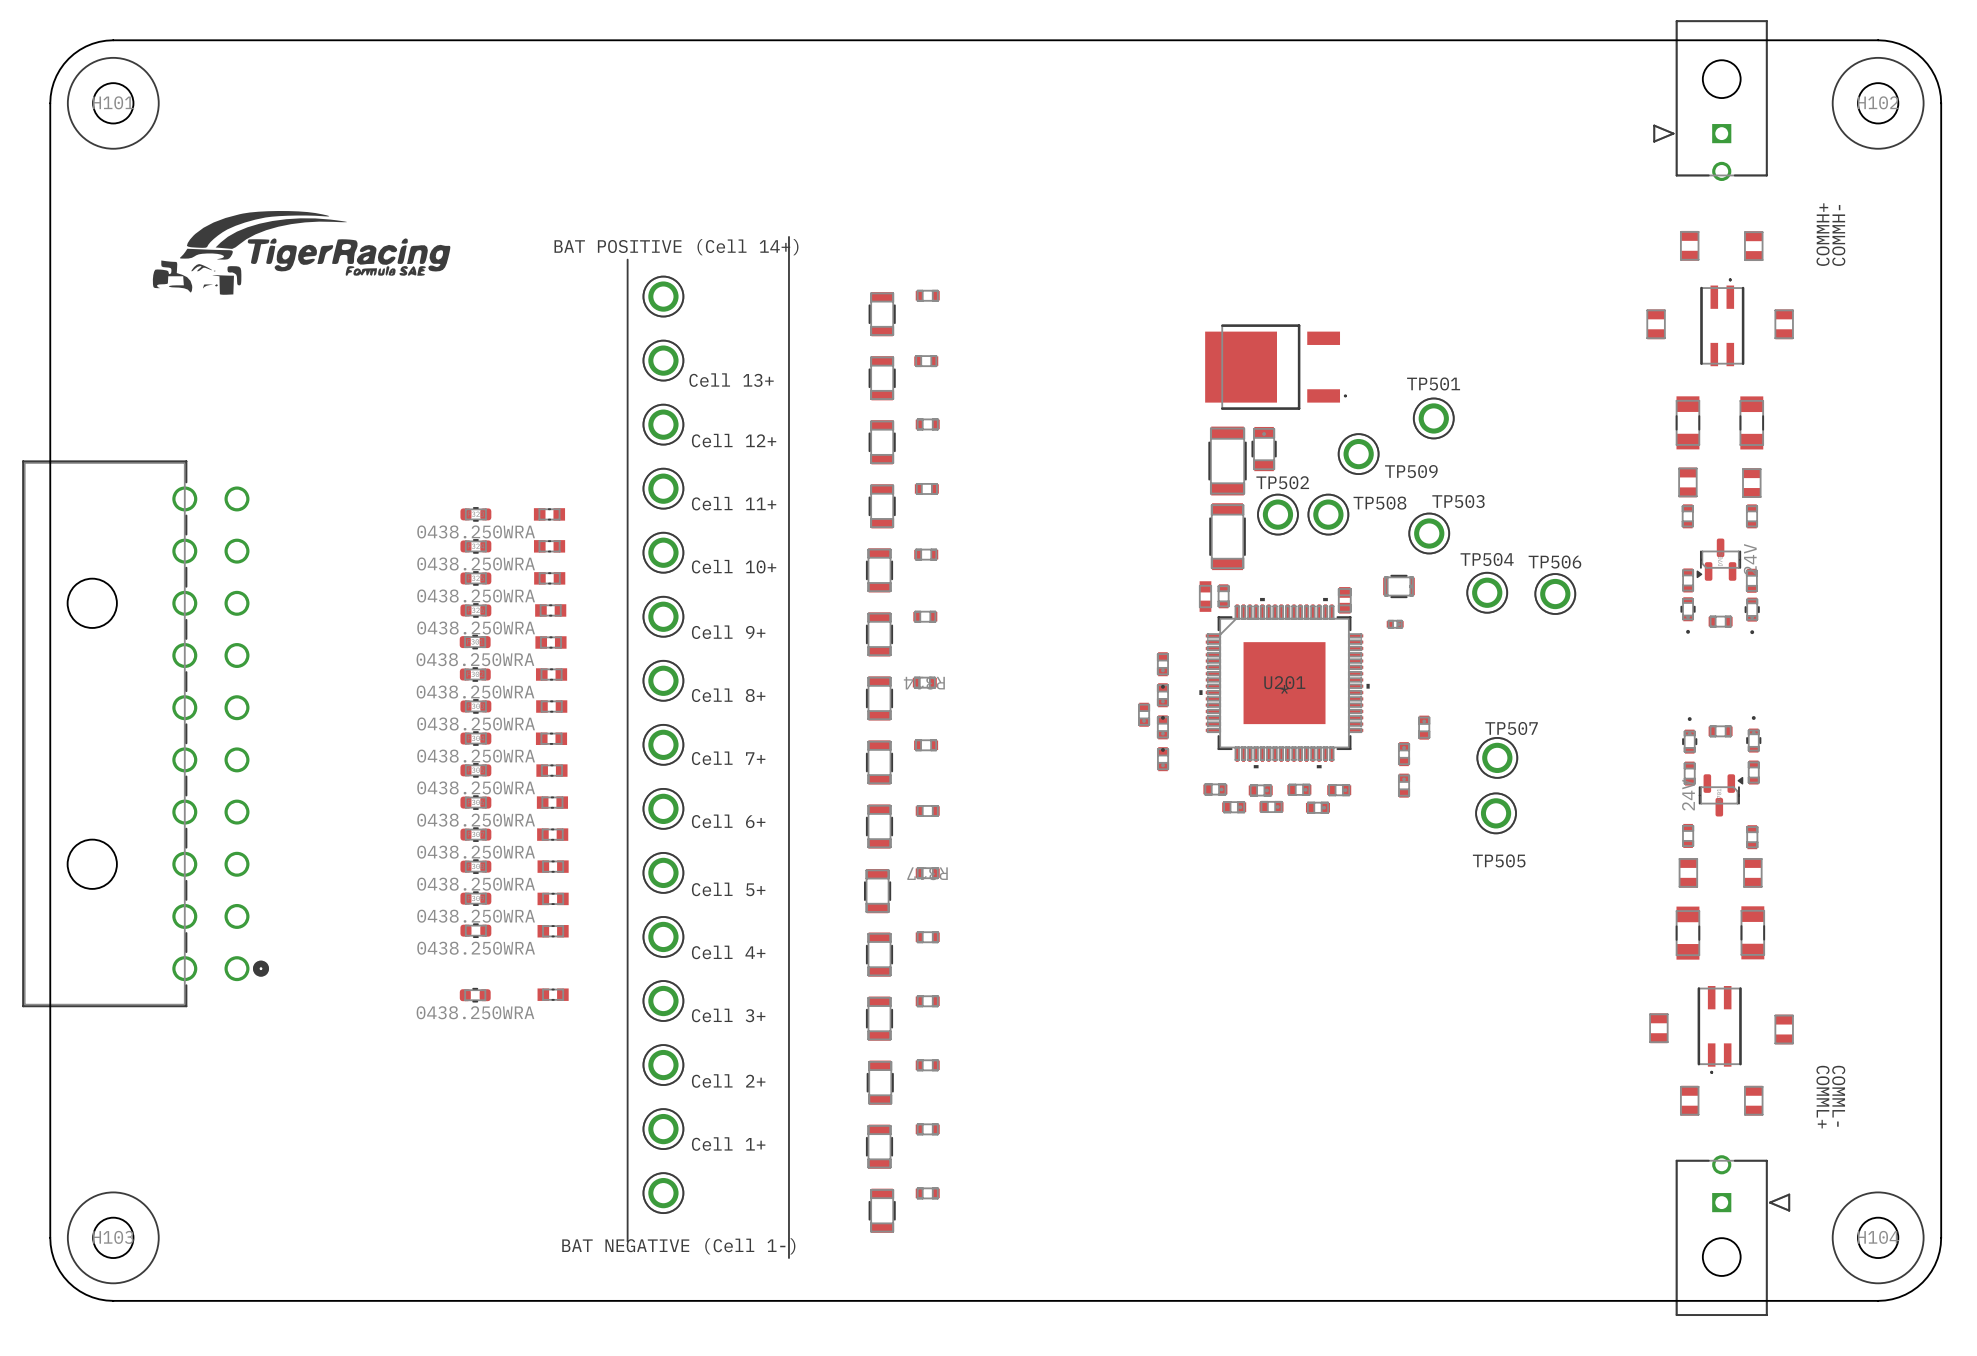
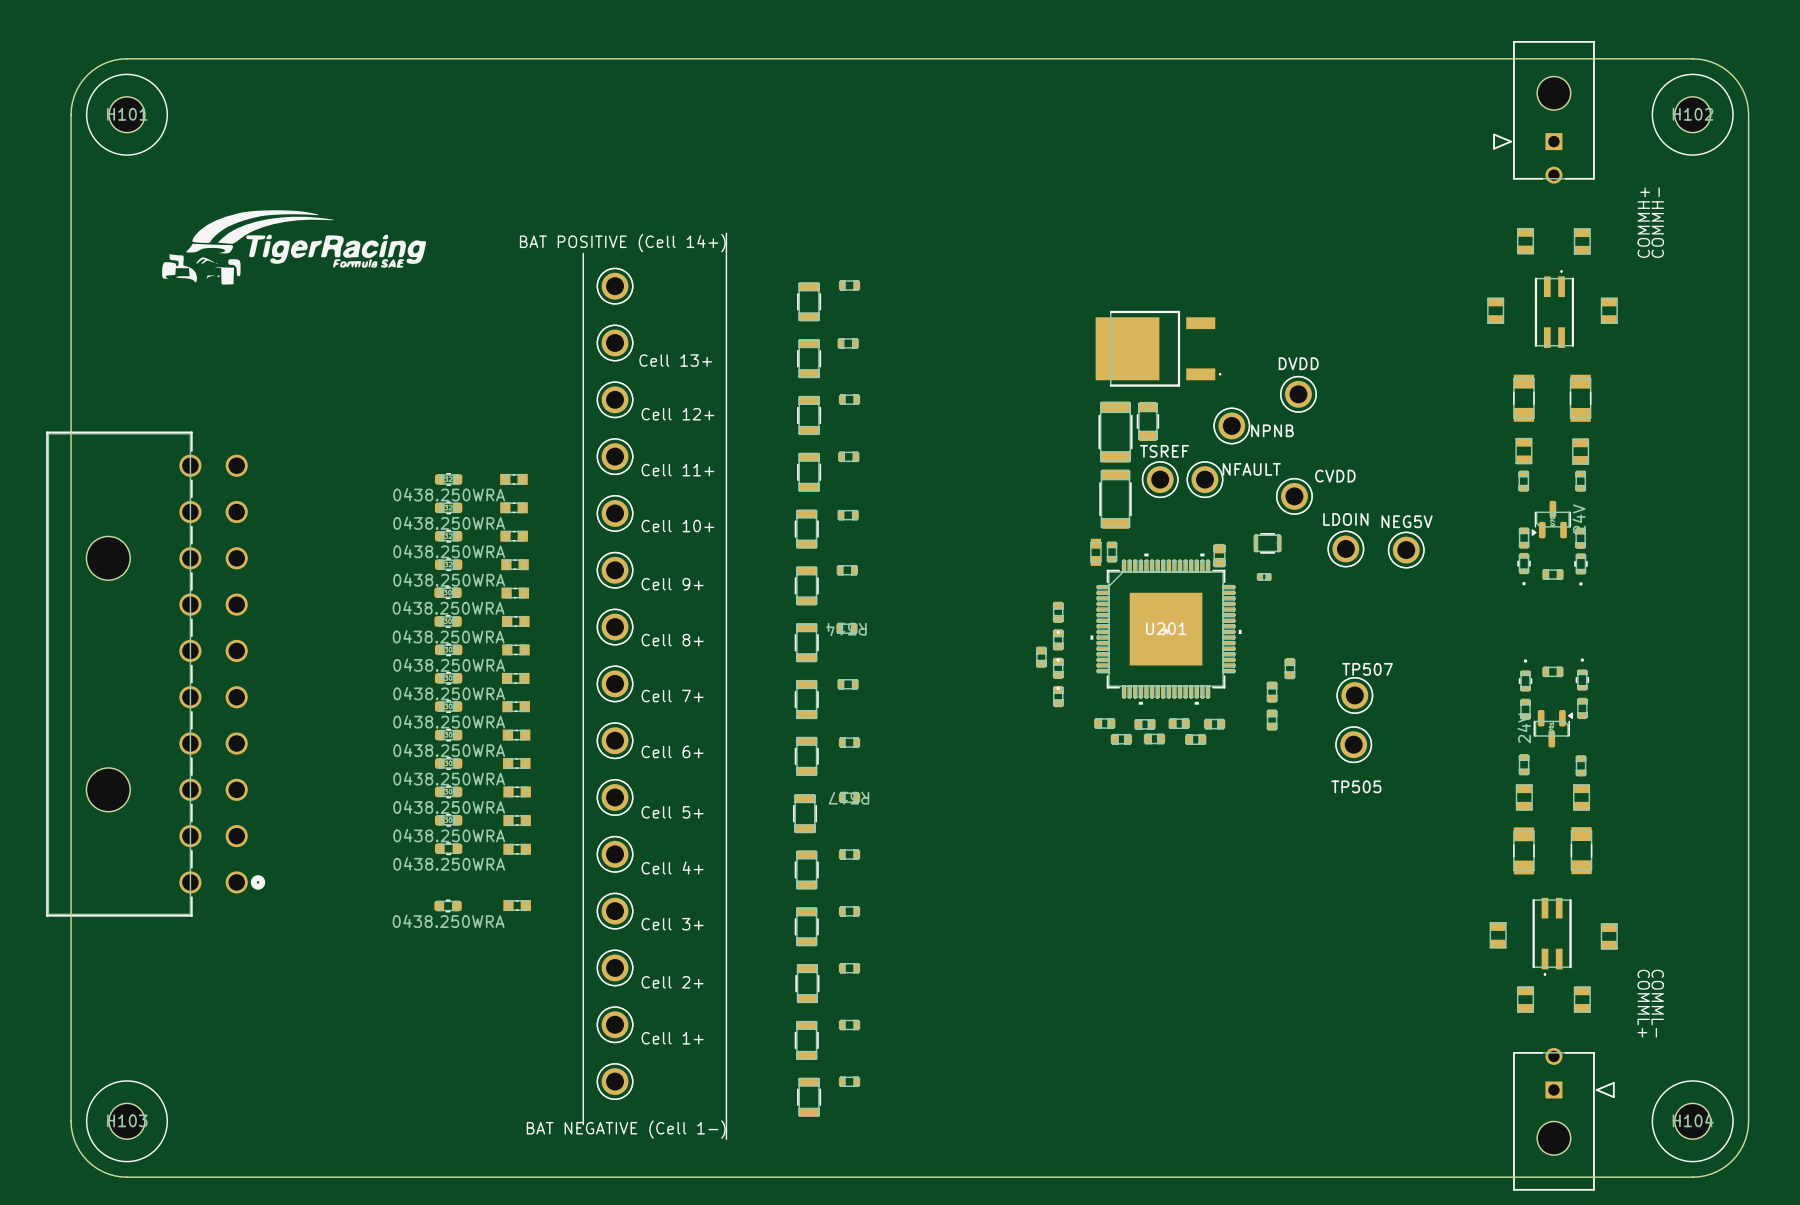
TP501 name: TP501 (1433, 383) -> DVDD (1298, 363)
TP509 name: TP509 (1411, 471) -> NPNB (1272, 430)
TP502 name: TP502 (1282, 482) -> TSREF (1164, 451)
TP503 name: TP503 (1458, 501) -> CVDD (1335, 476)
TP508 name: TP508 (1379, 503) -> NFAULT (1251, 469)
TP504 name: TP504 (1487, 559) -> LDOIN (1345, 519)
TP506 name: TP506 (1554, 562) -> NEG5V (1407, 521)

